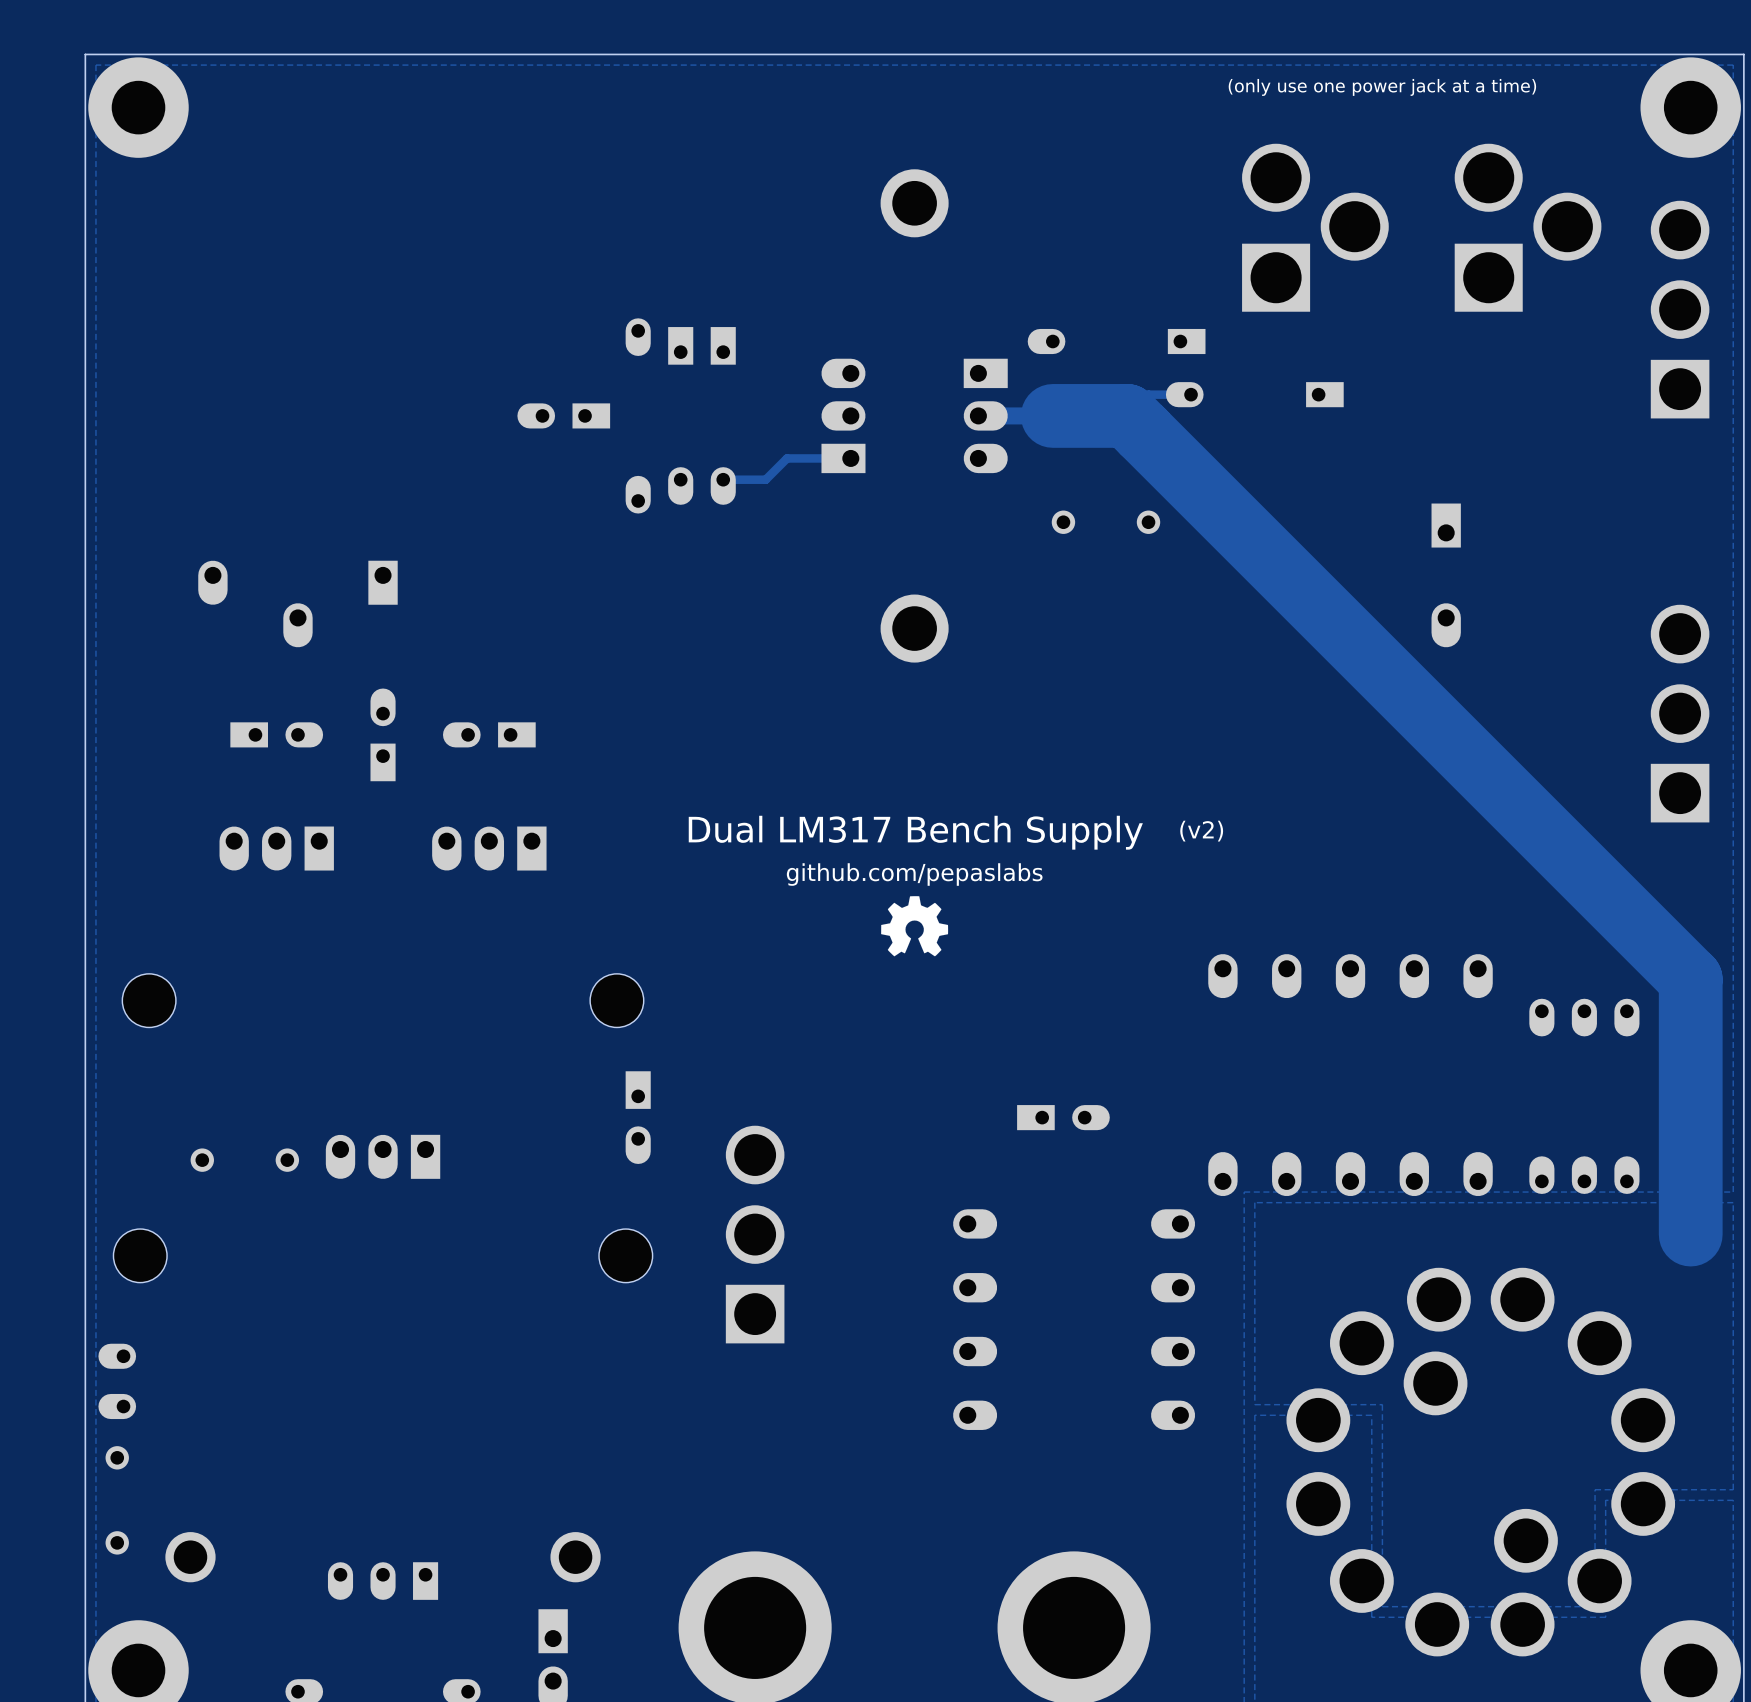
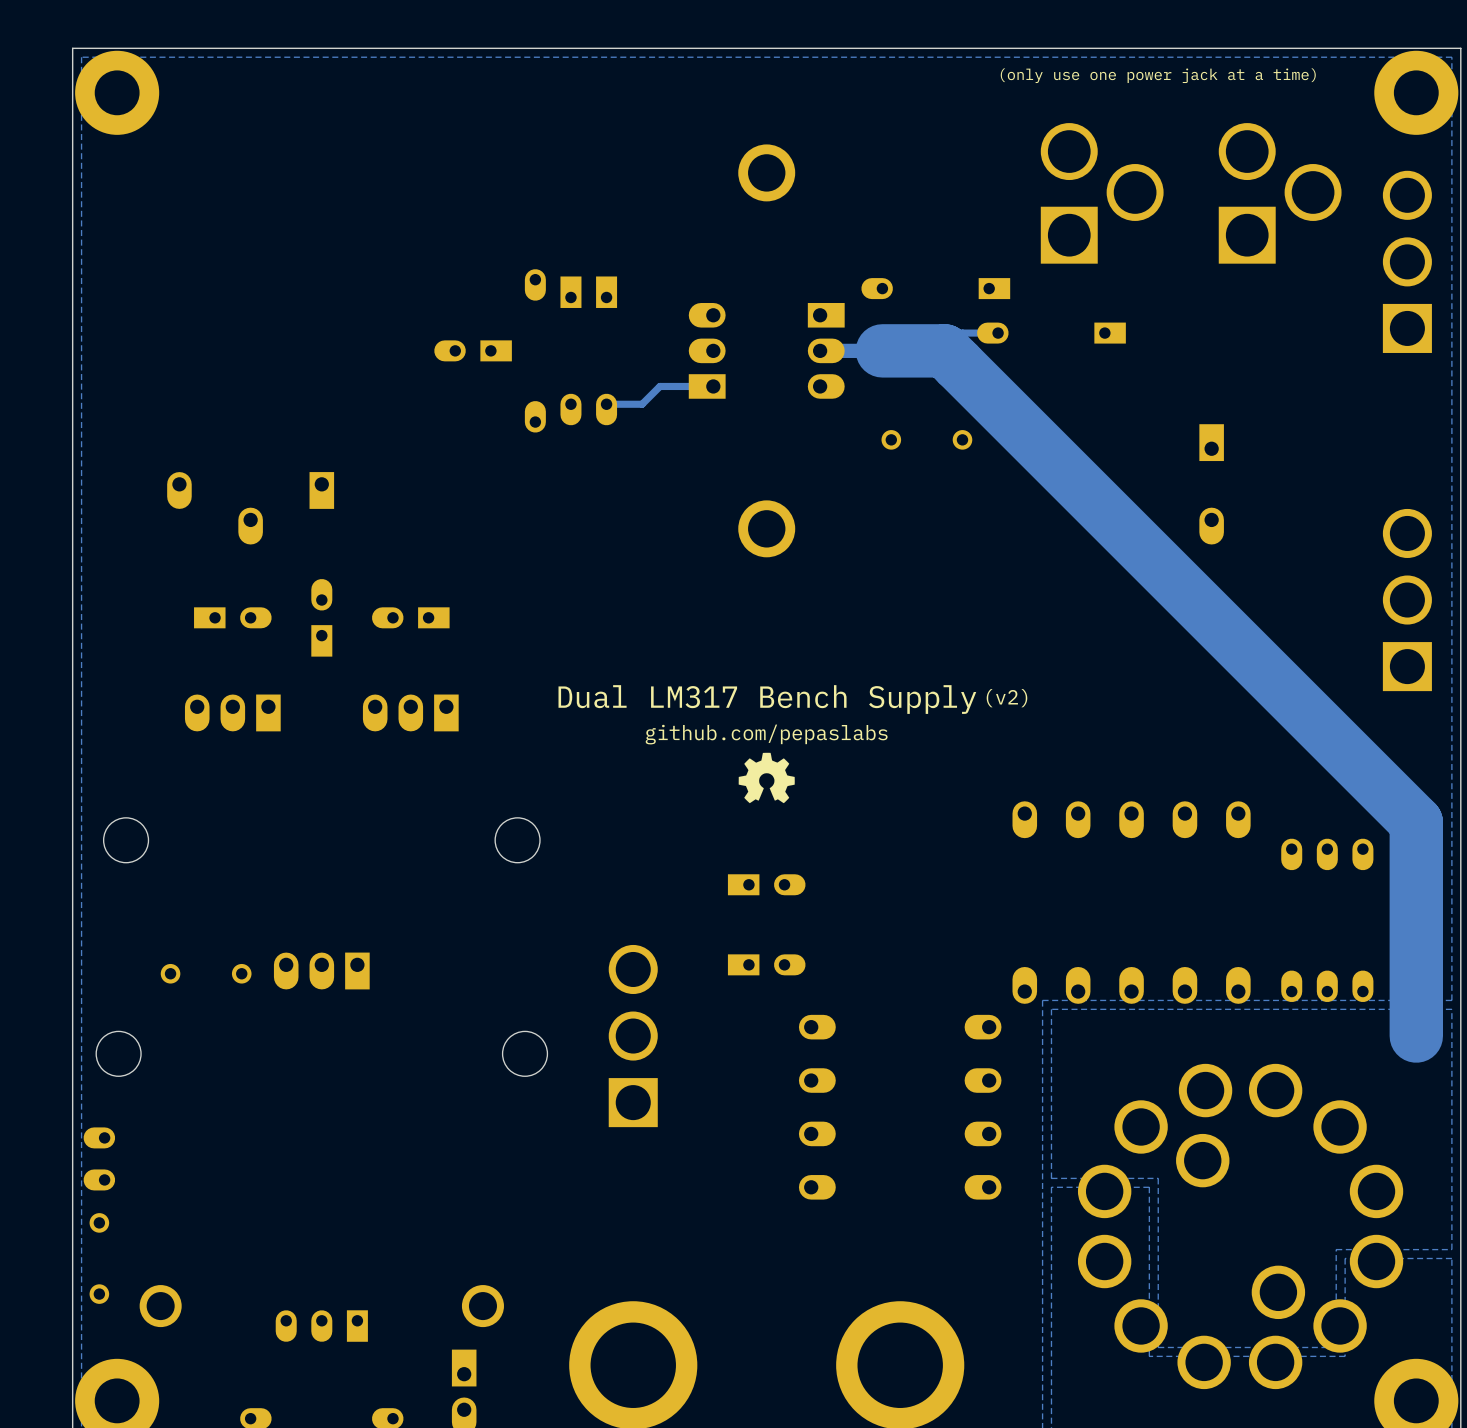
part: none -> (766, 884)
part: (638, 1117) -> none
part: (1063, 1117) -> none
part: none -> (766, 964)

